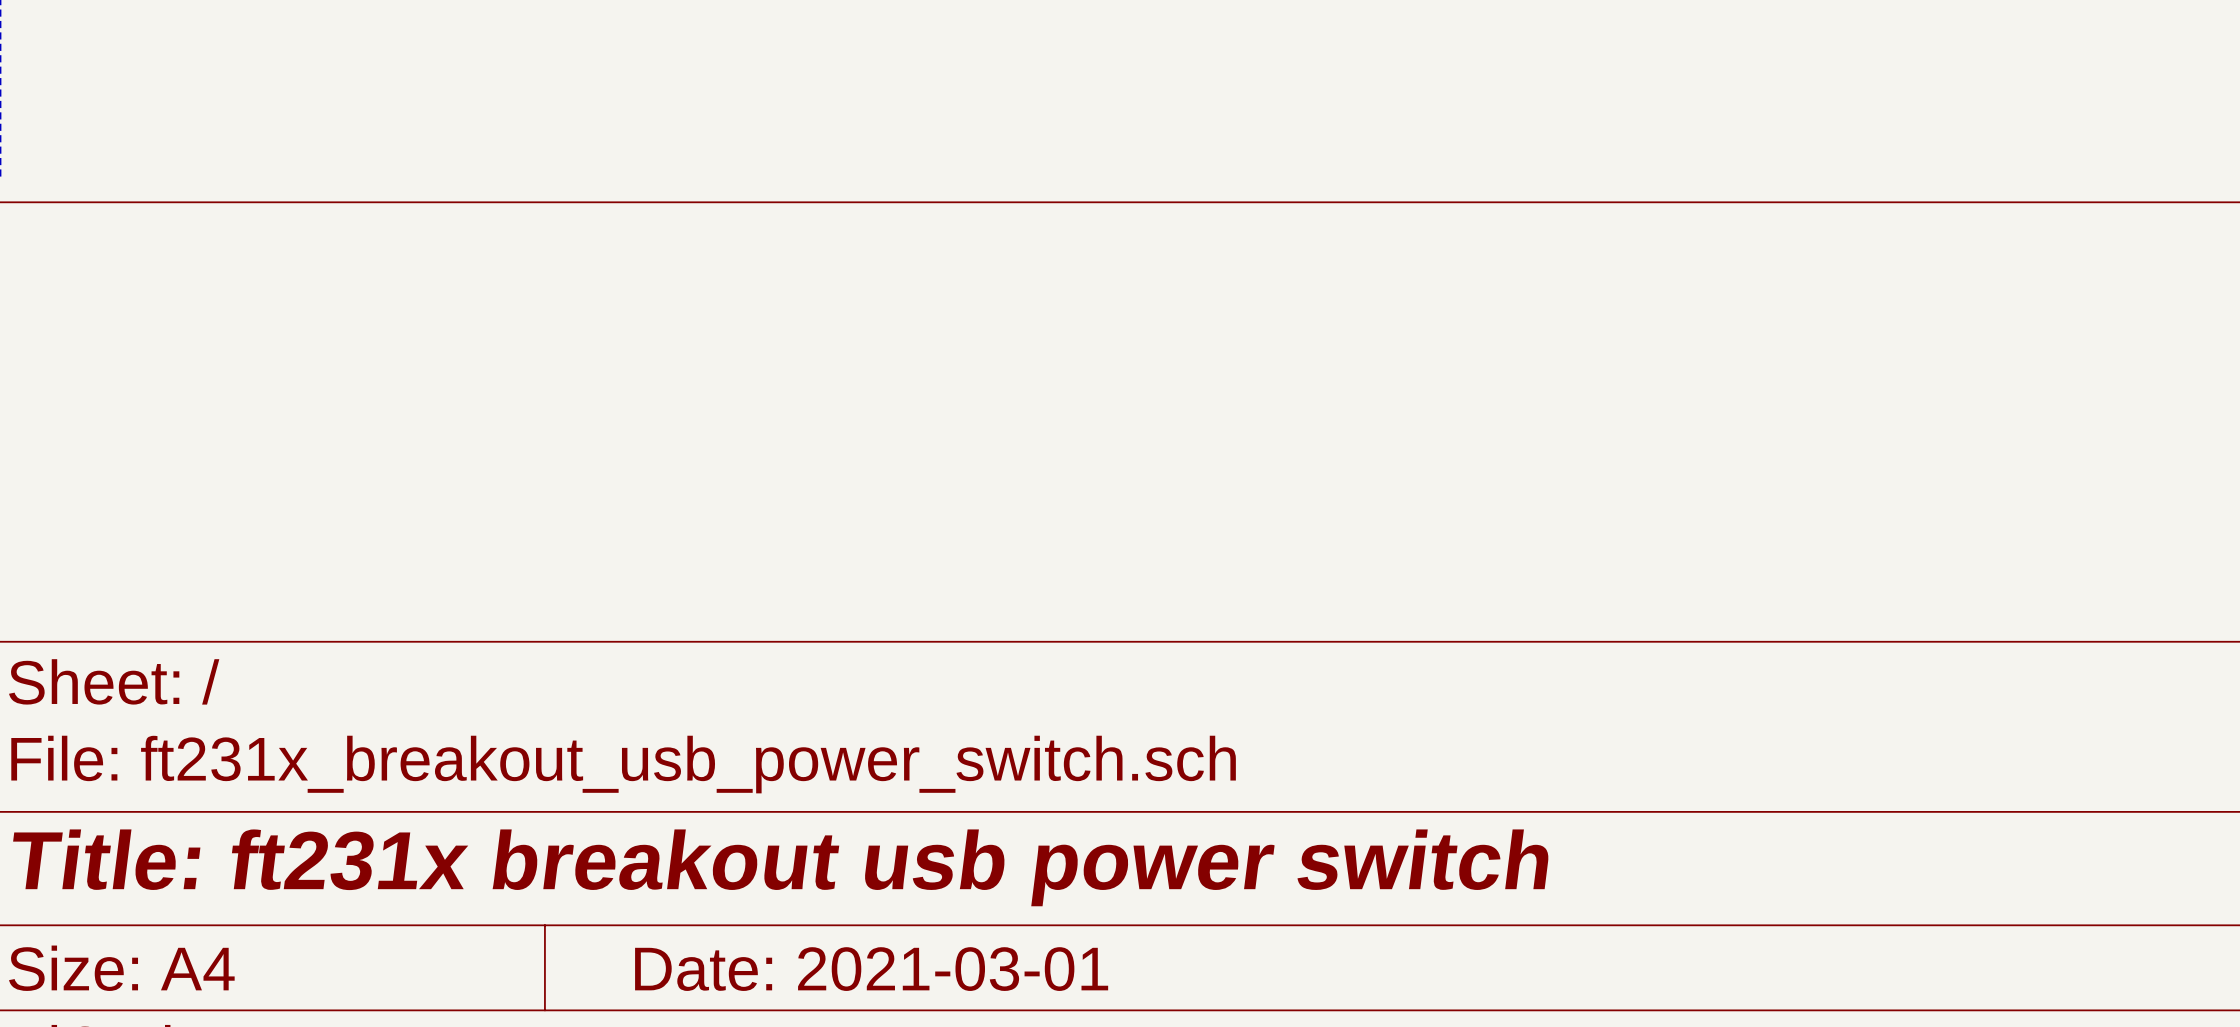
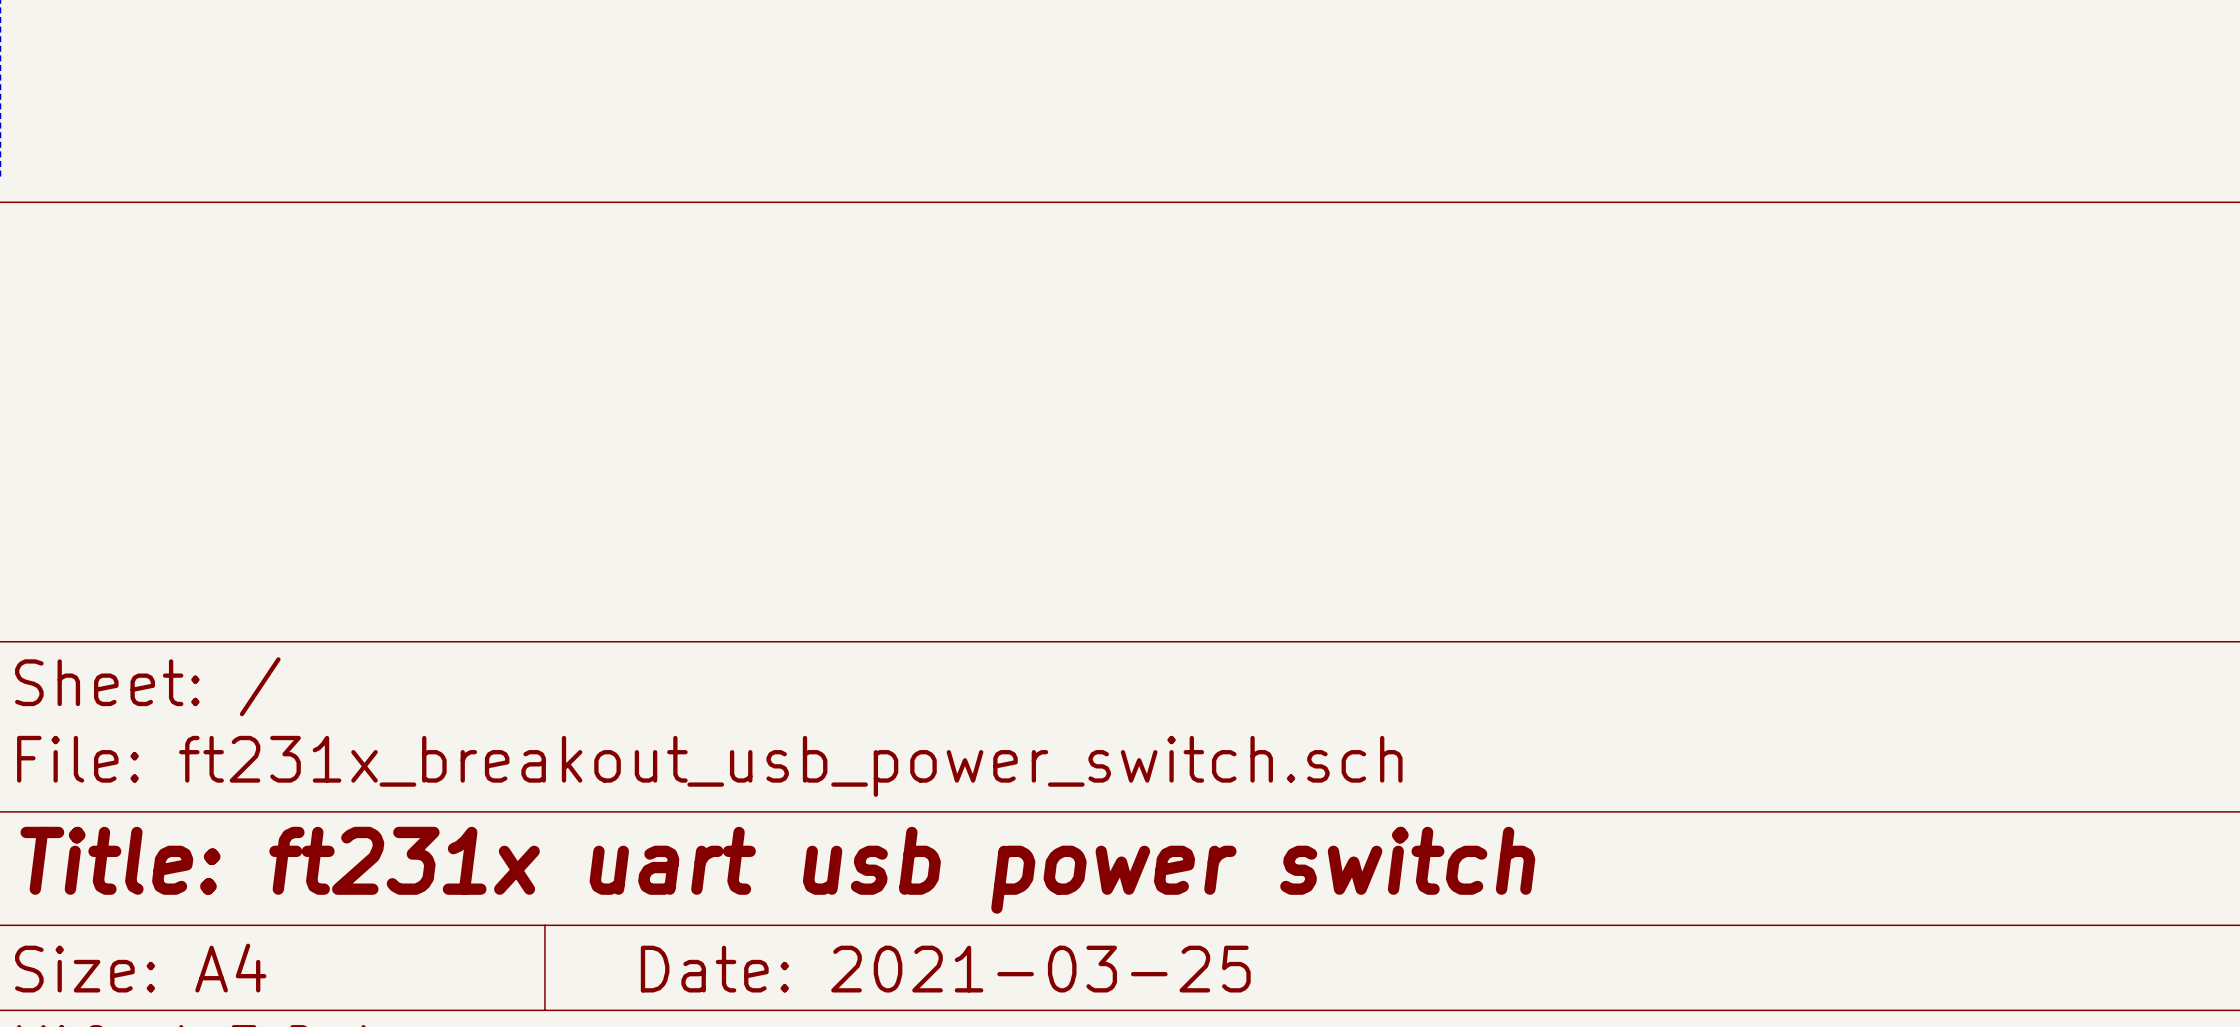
title block: Title: ft231x breakout usb power switch (781, 867) -> Title: ft231x uart usb power switch (777, 870)
title block: Date: 2021-03-01 (871, 969) -> Date: 2021-03-25 (945, 969)

